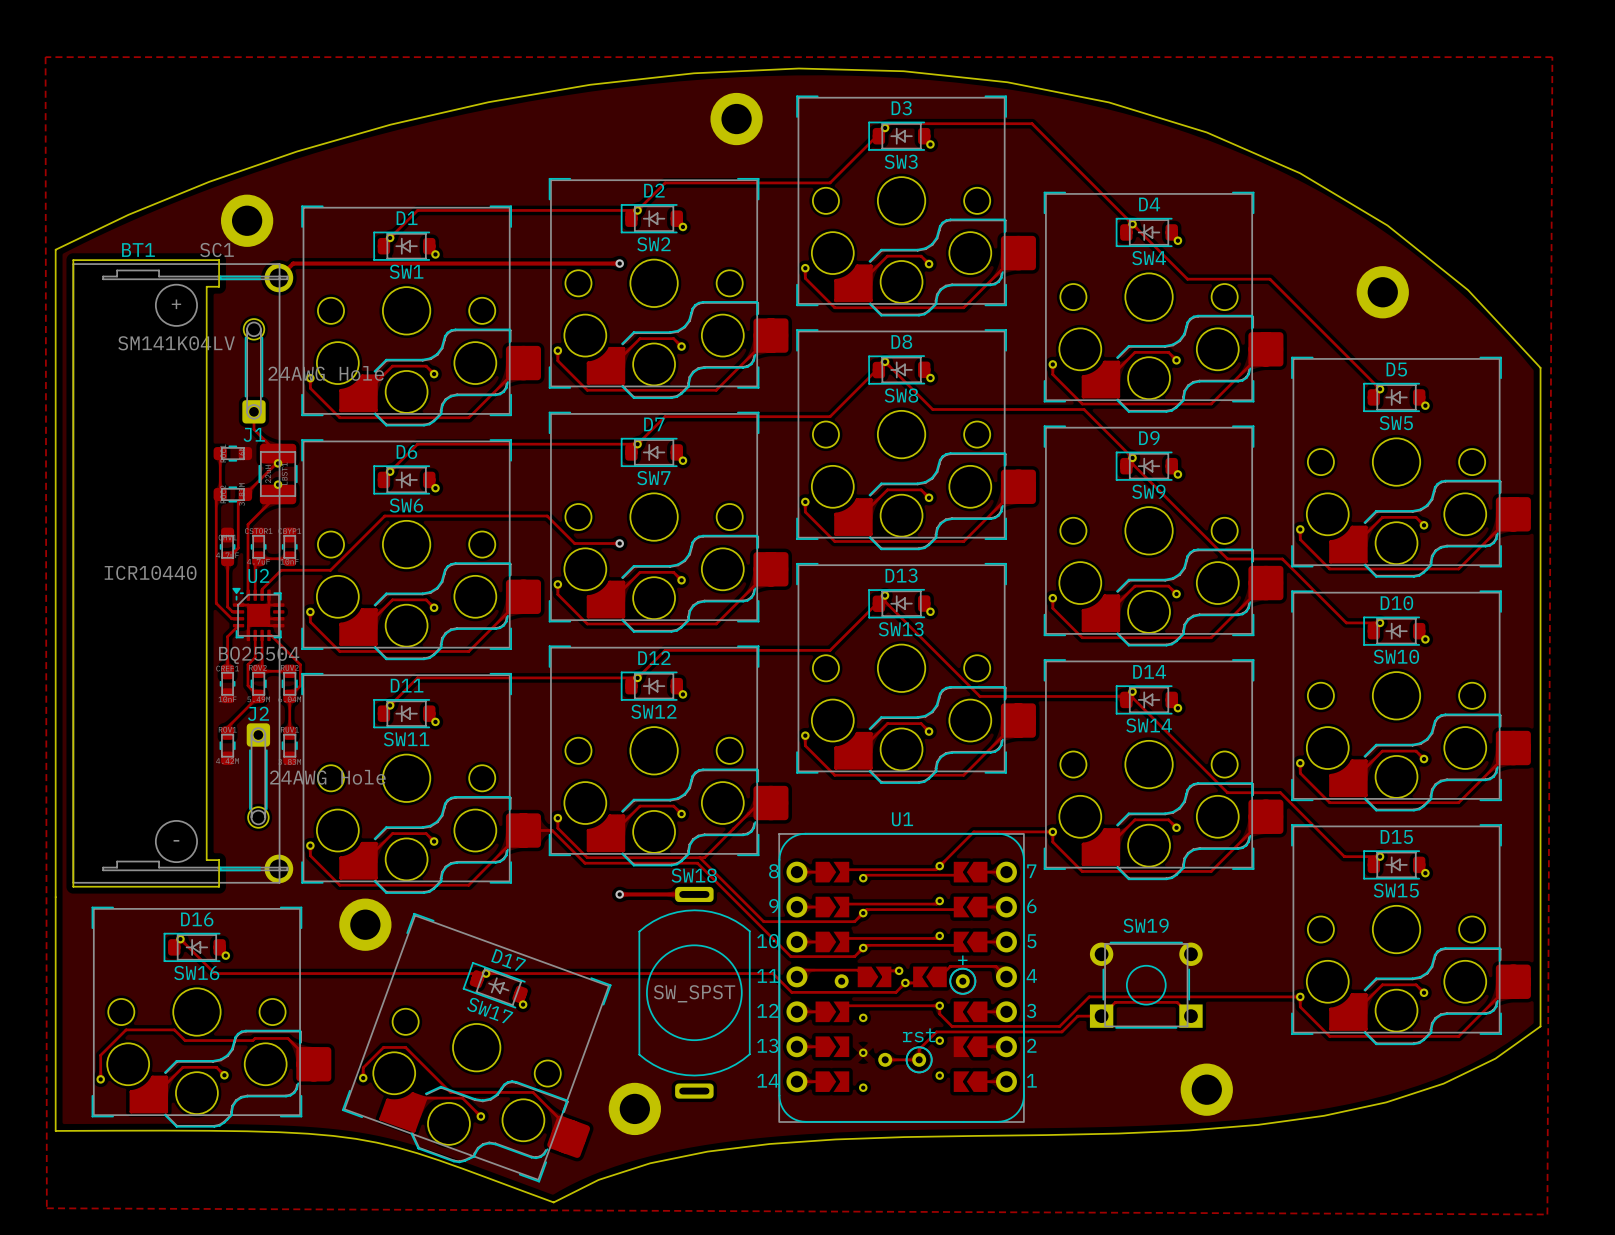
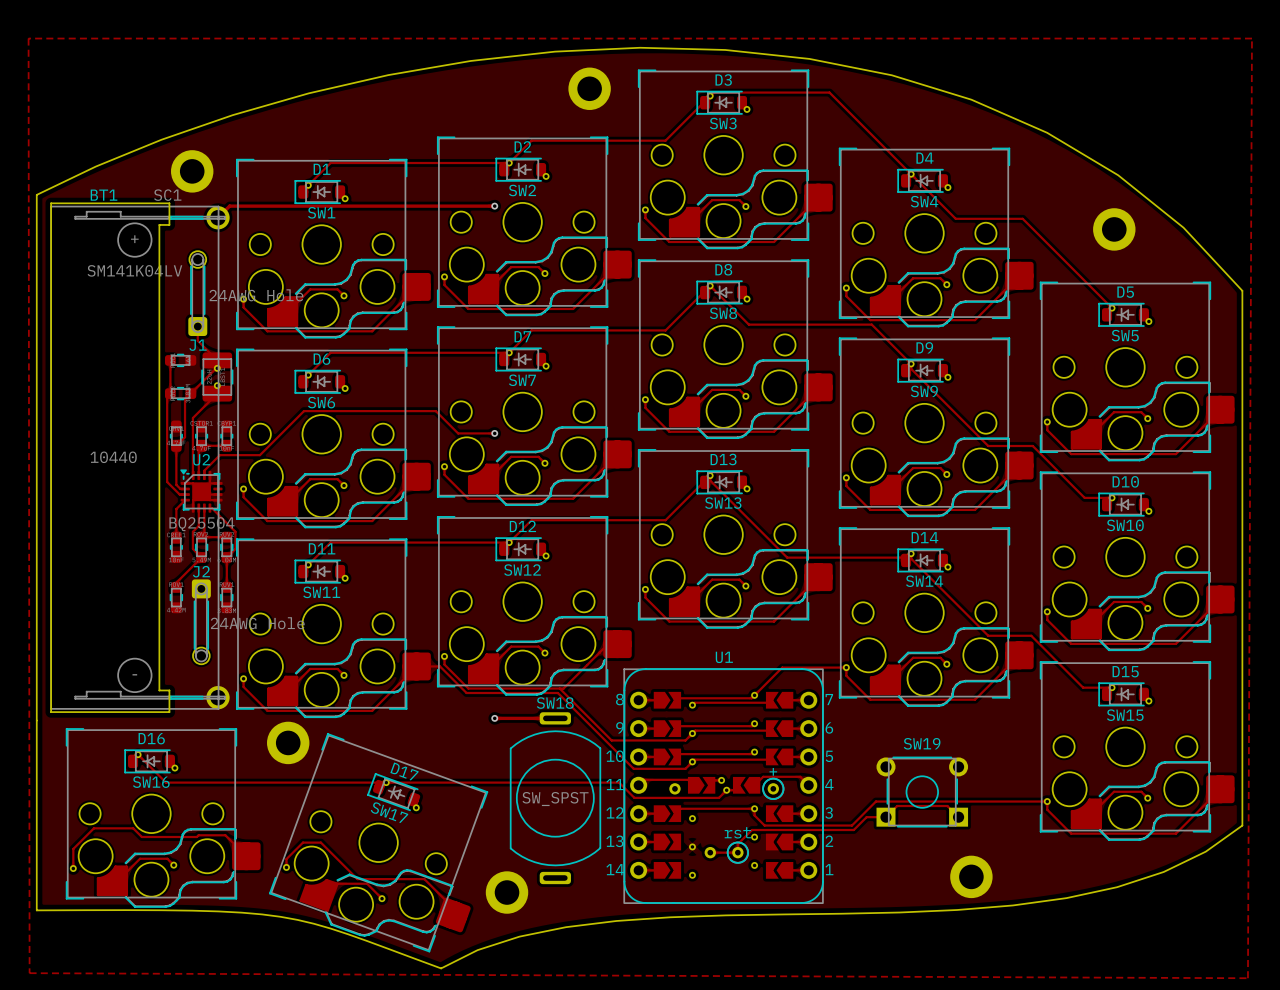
BT1 value: ICR10440 (150, 572) -> 10440 (113, 457)

